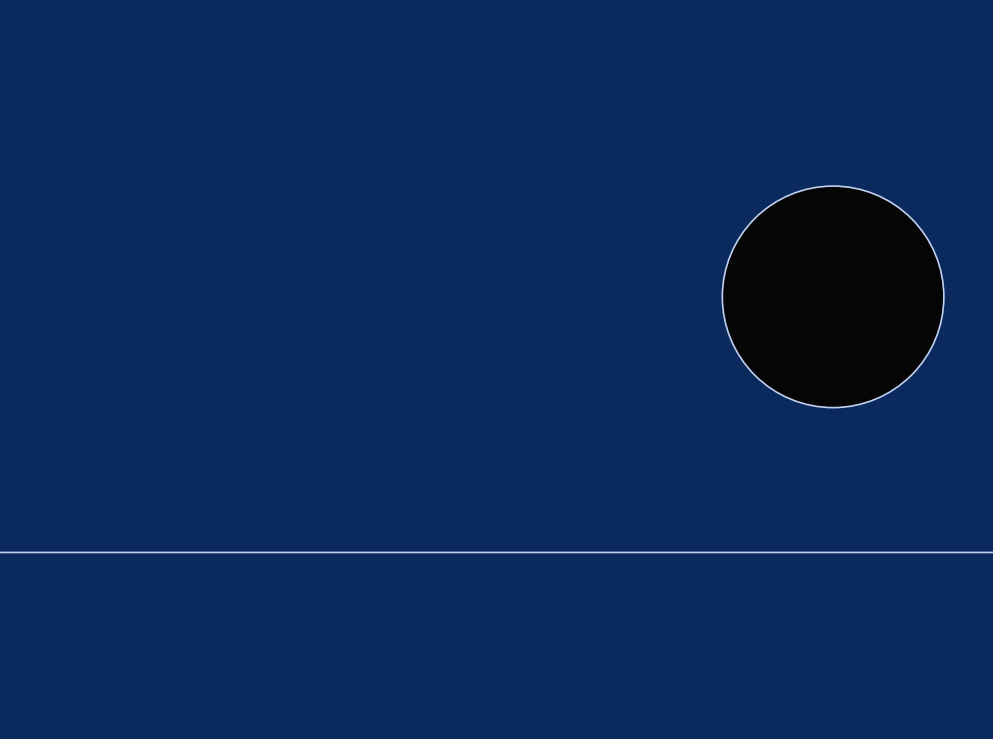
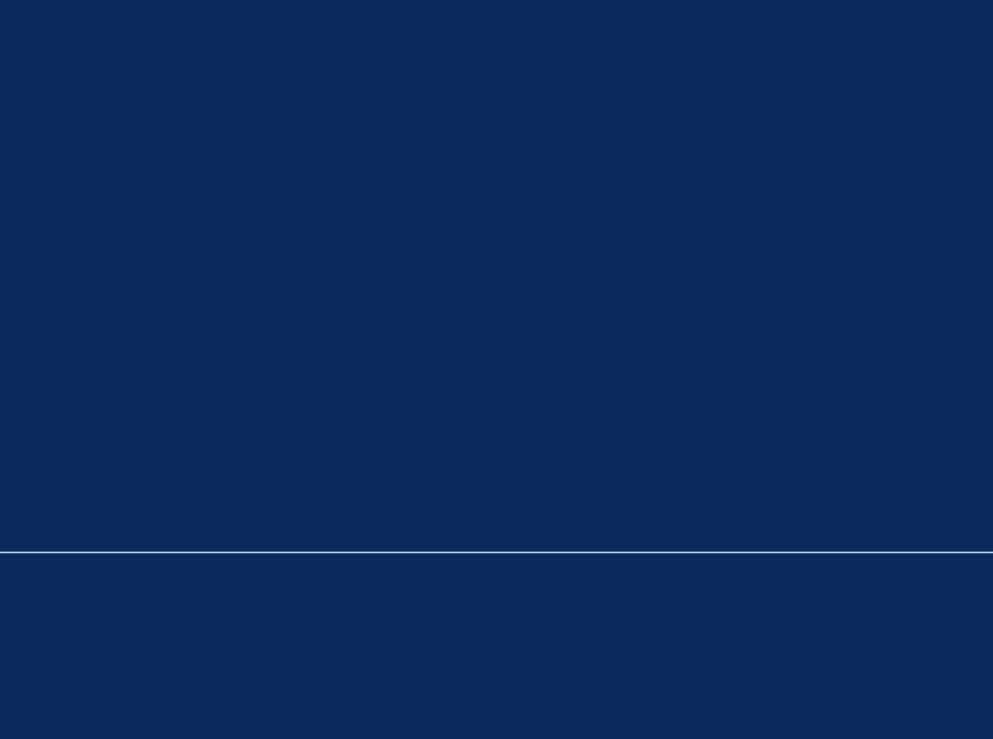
part: (833, 296) -> none

